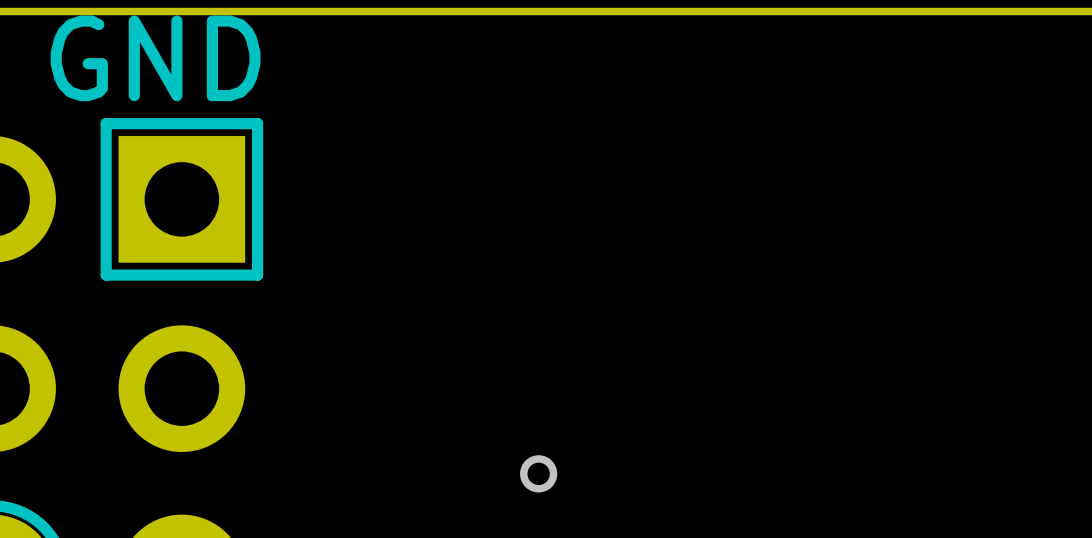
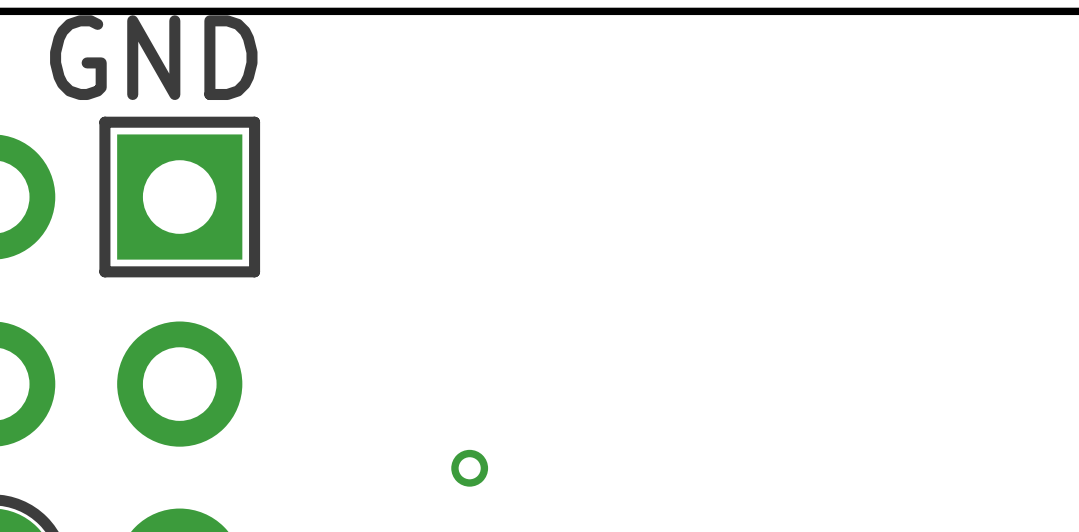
via position: (538, 473) -> (469, 468)

